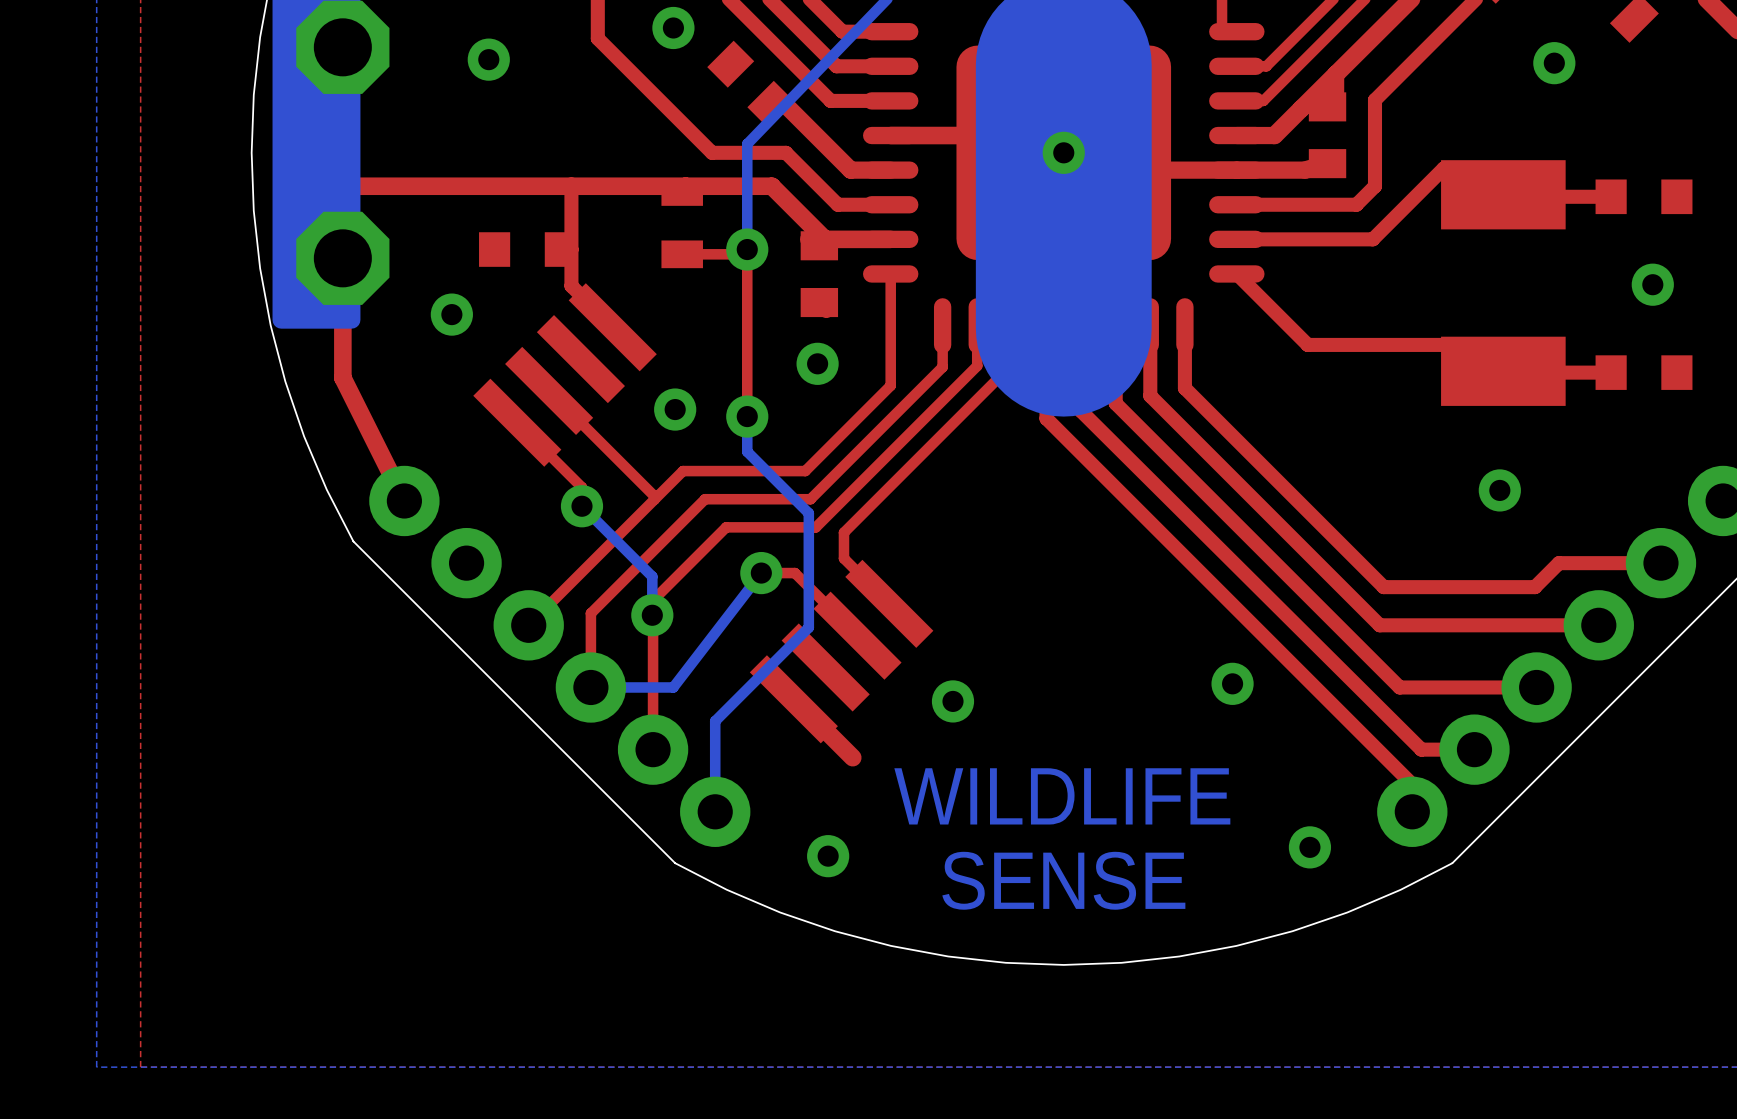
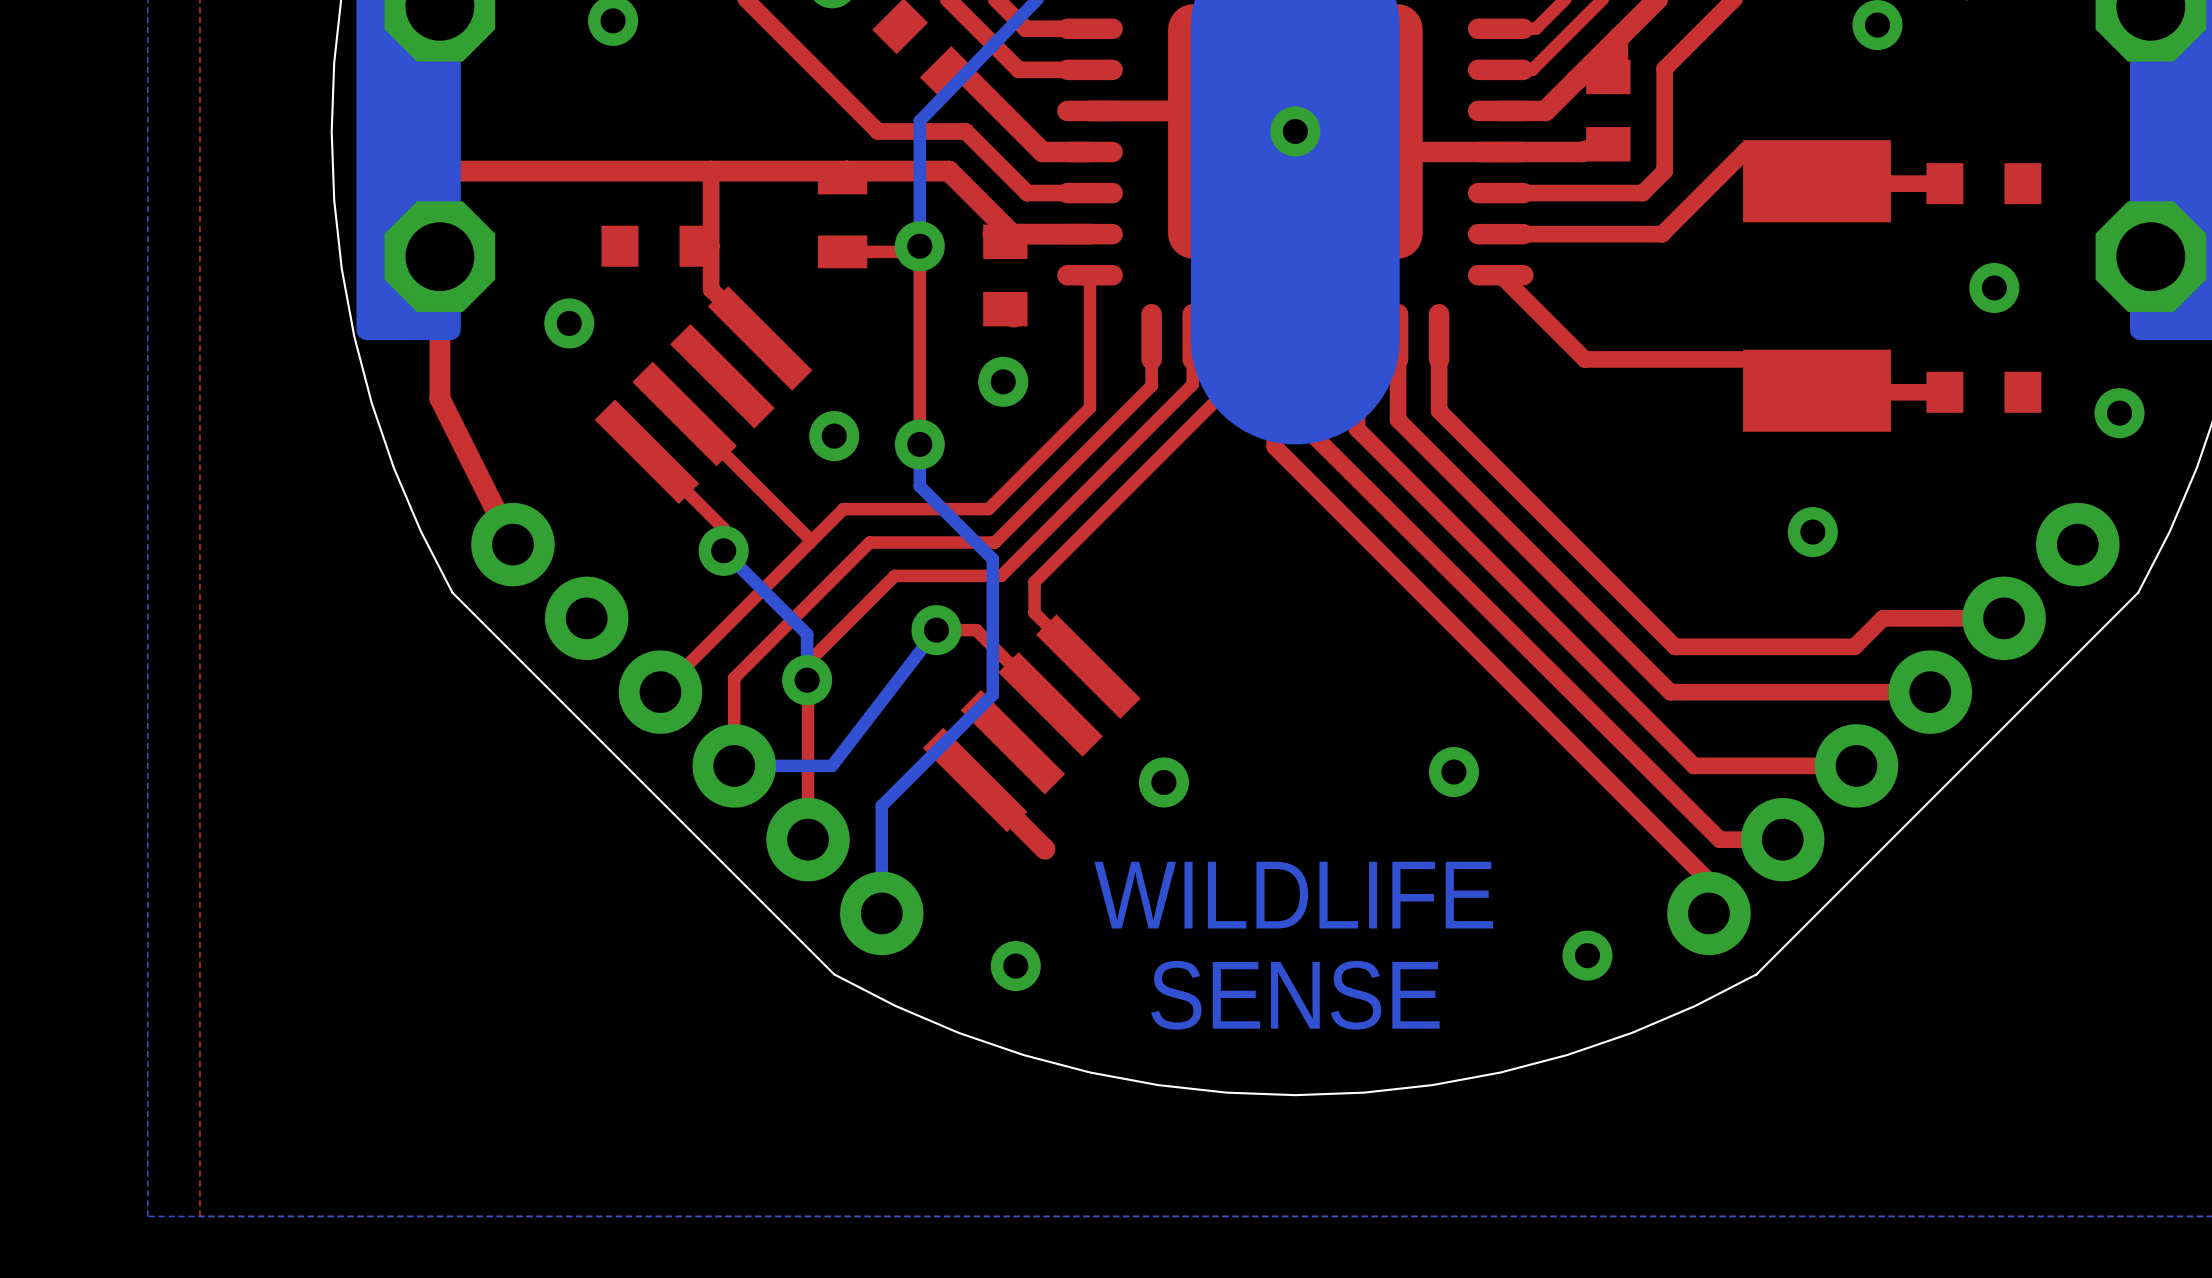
via position: (1232, 683) -> (1453, 772)

